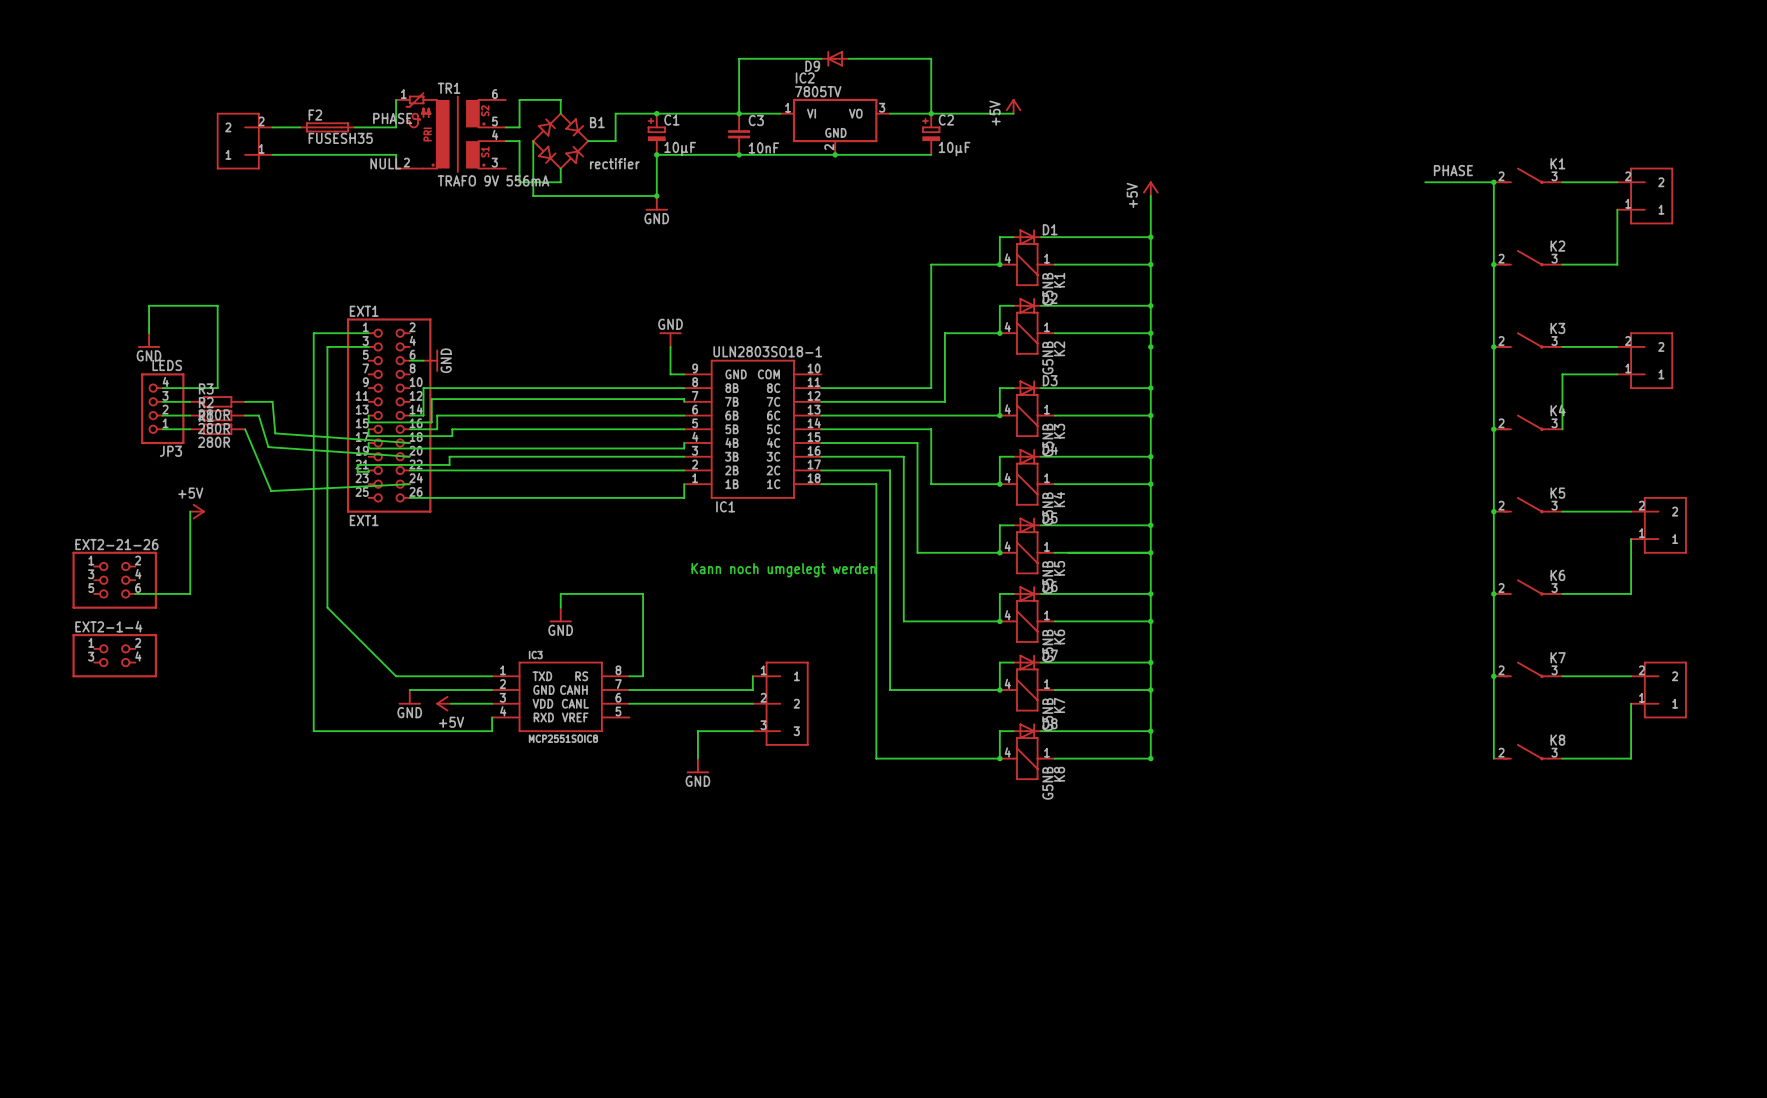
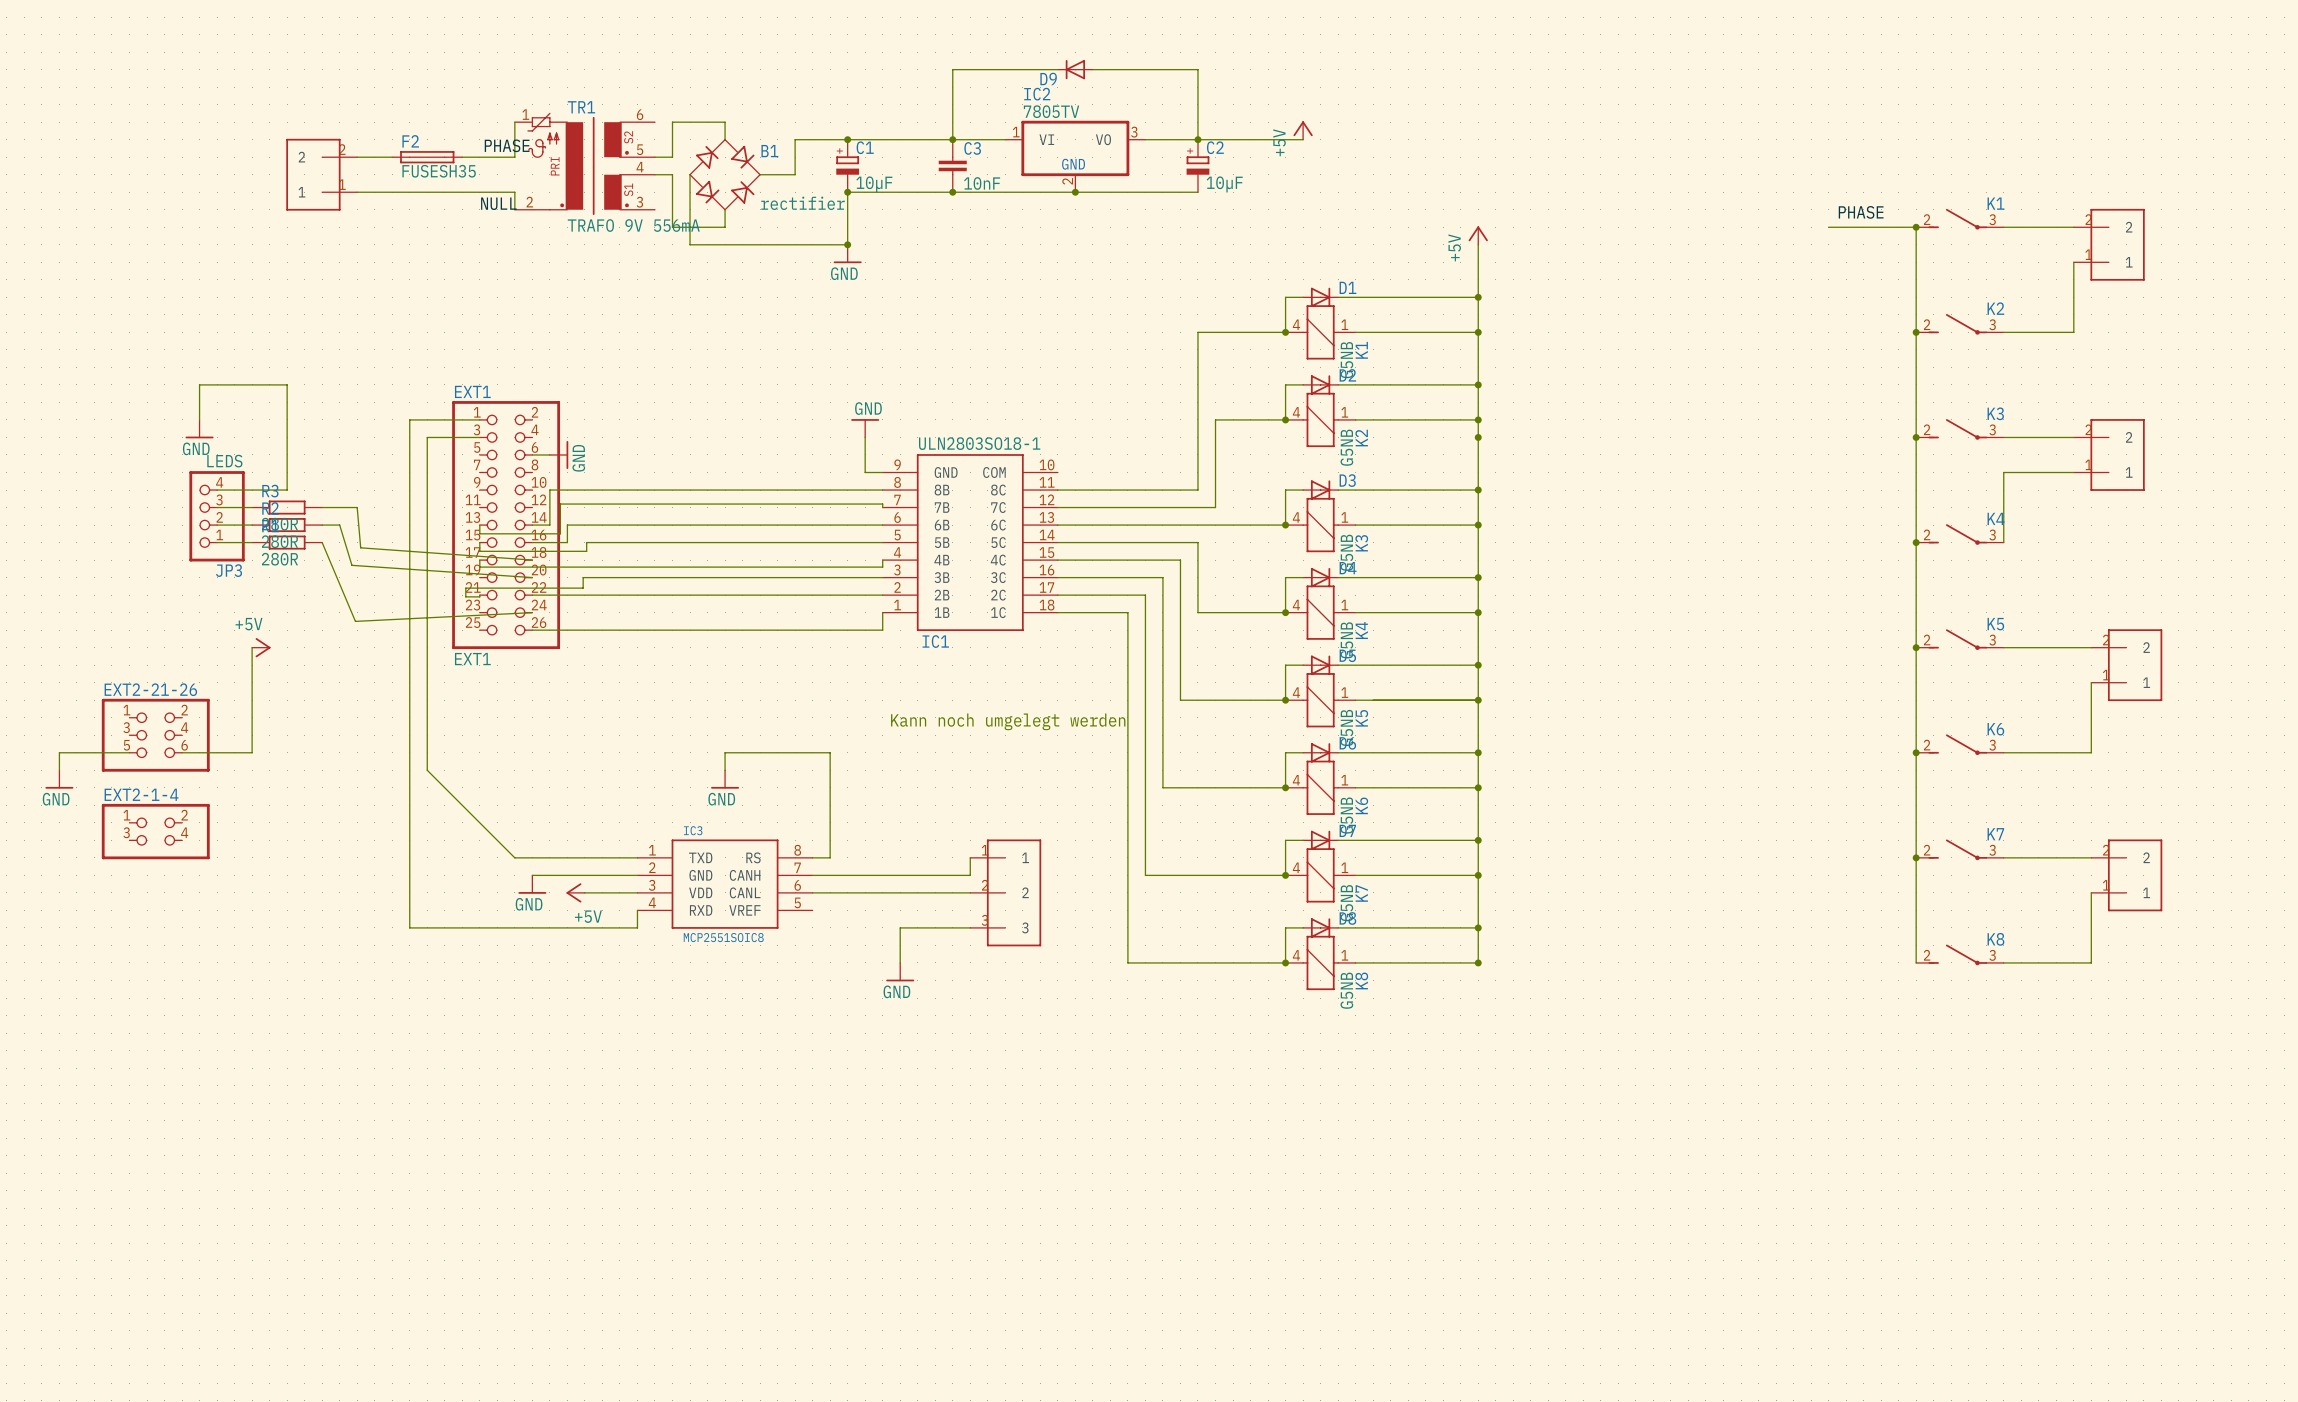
wire: none -> (129, 752) (59, 752) (59, 770)
power symbol: none -> GND (59, 779)

